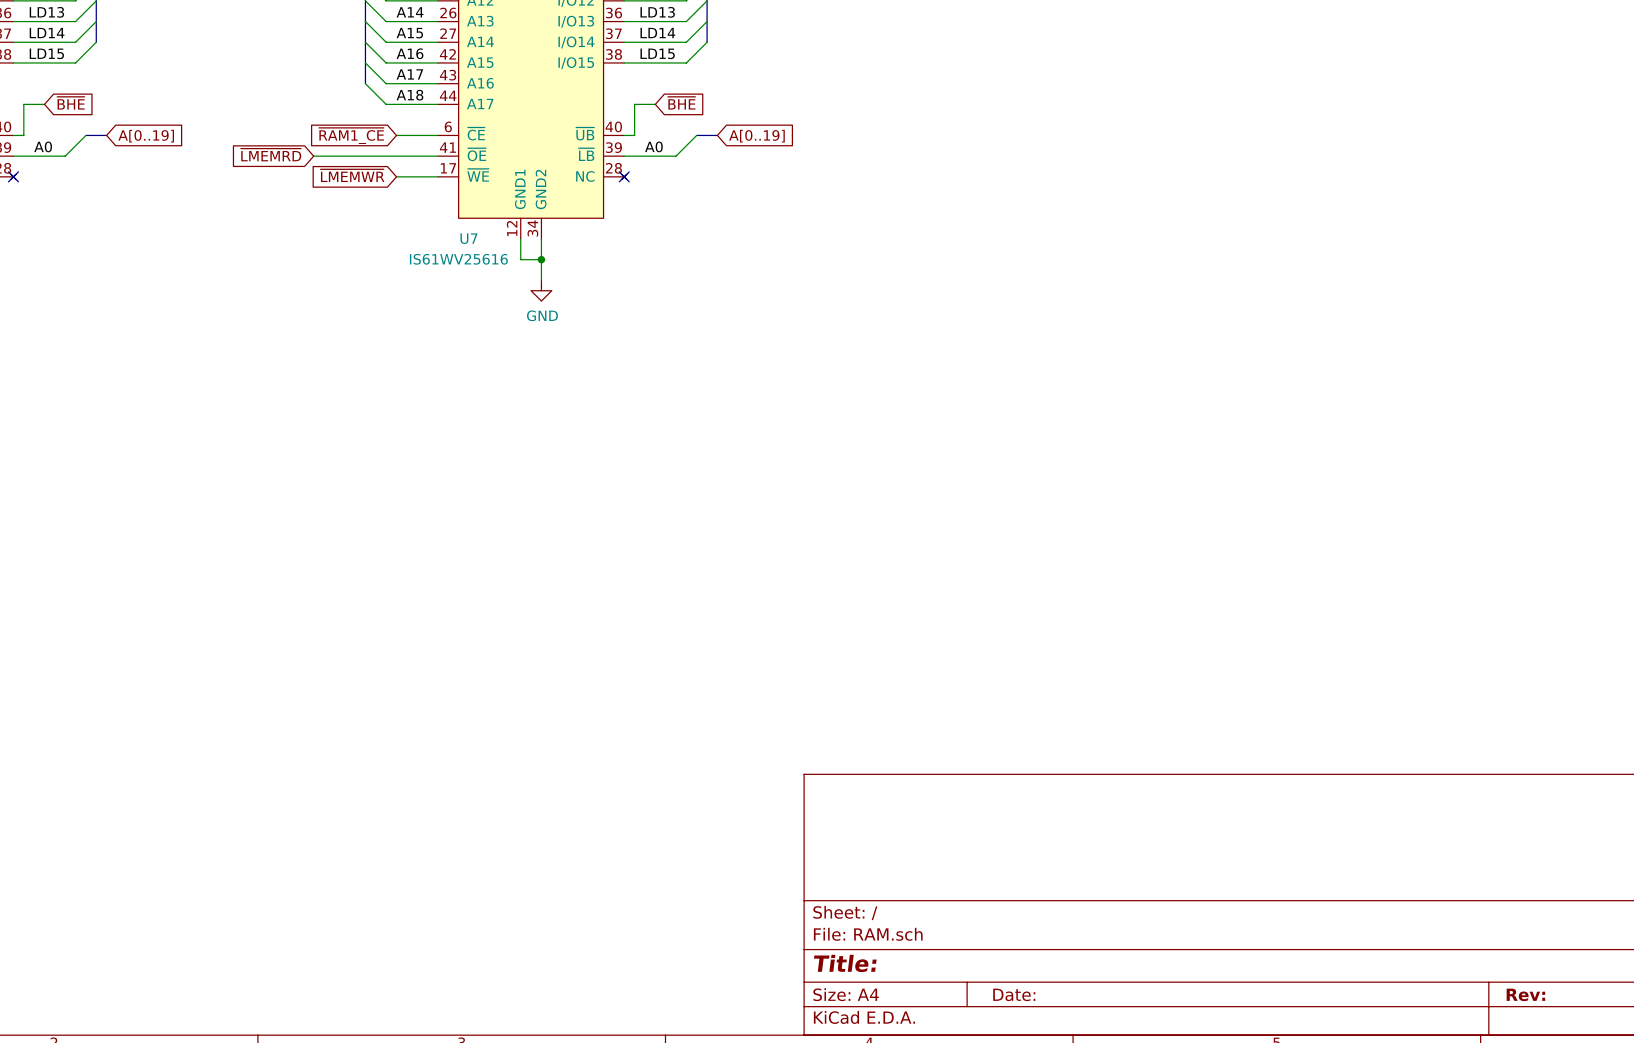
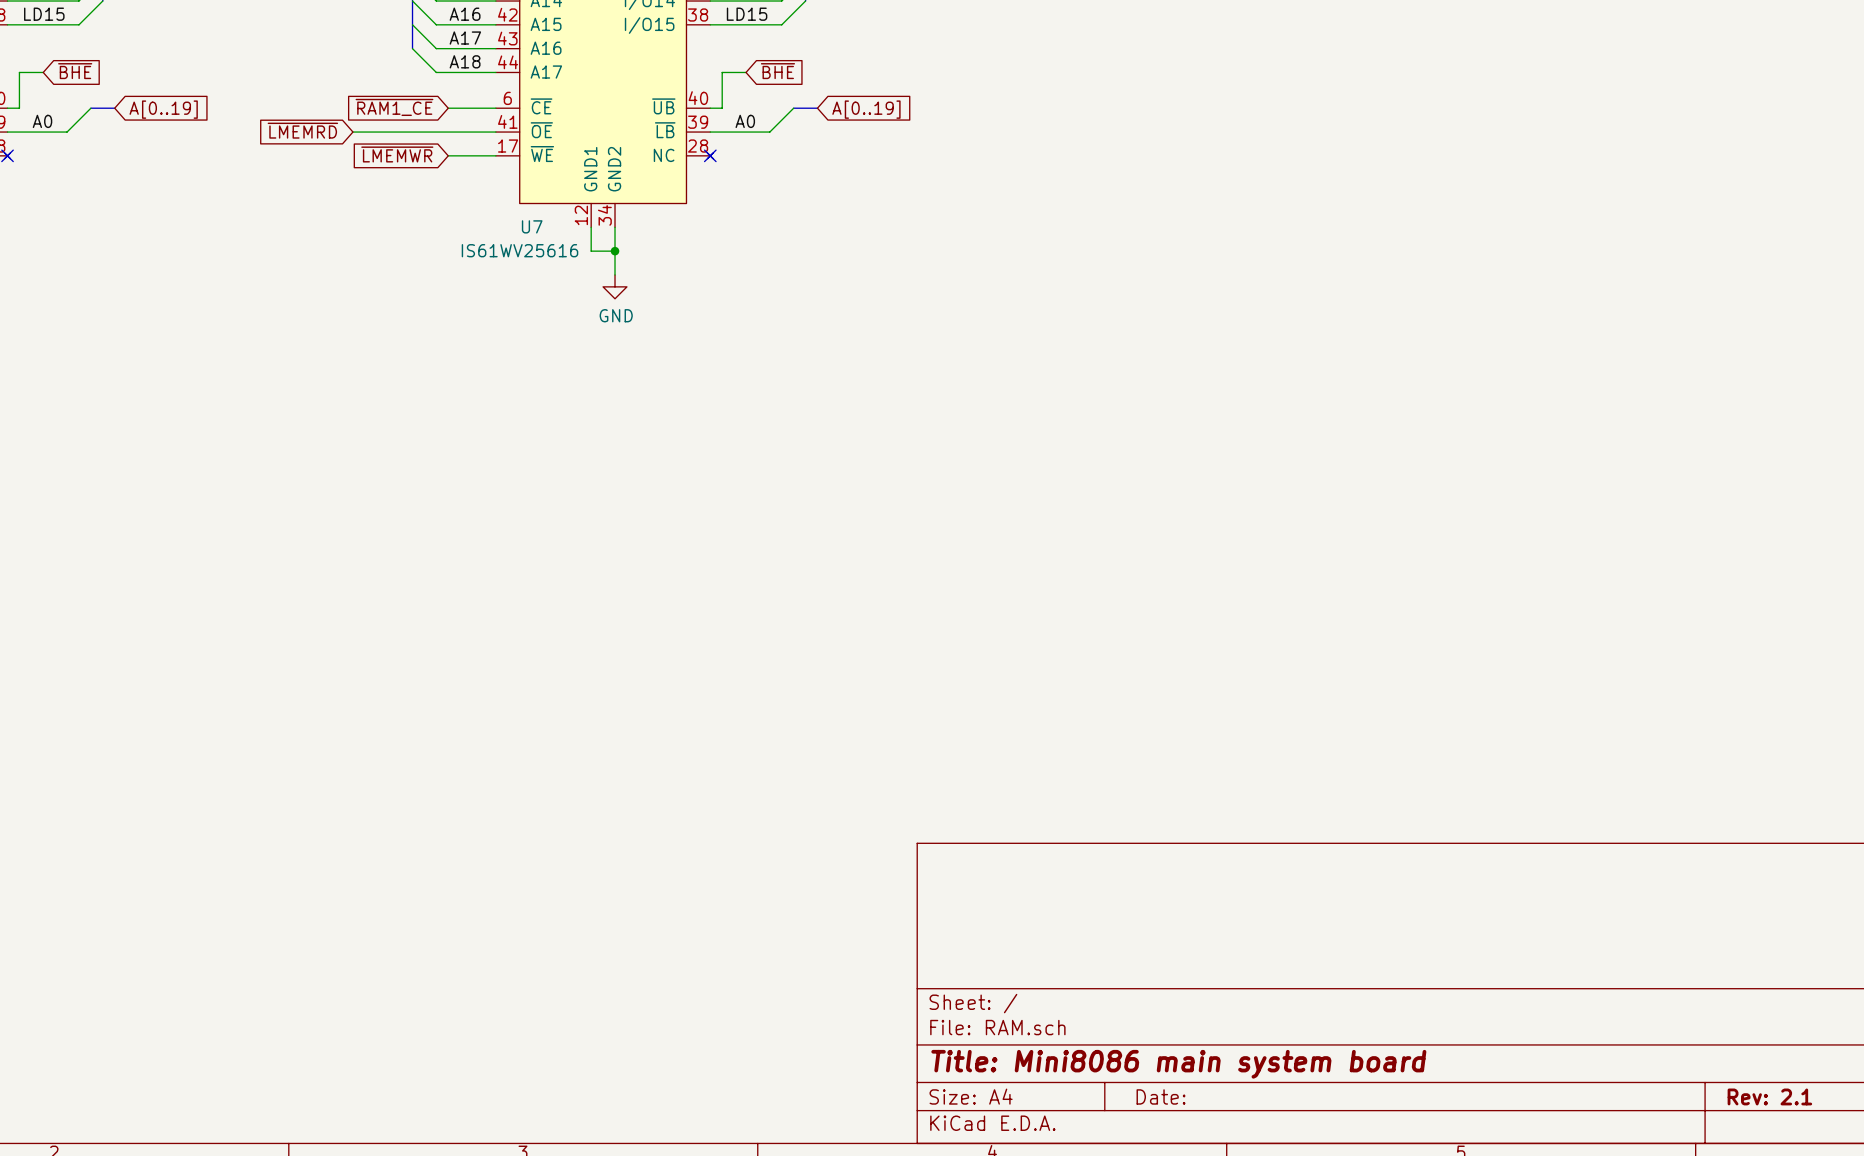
title block: Title: (845, 963) -> Title: Mini8086 main system board (1178, 1064)
title block: Rev: (1525, 994) -> Rev: 2.1 (1769, 1096)

